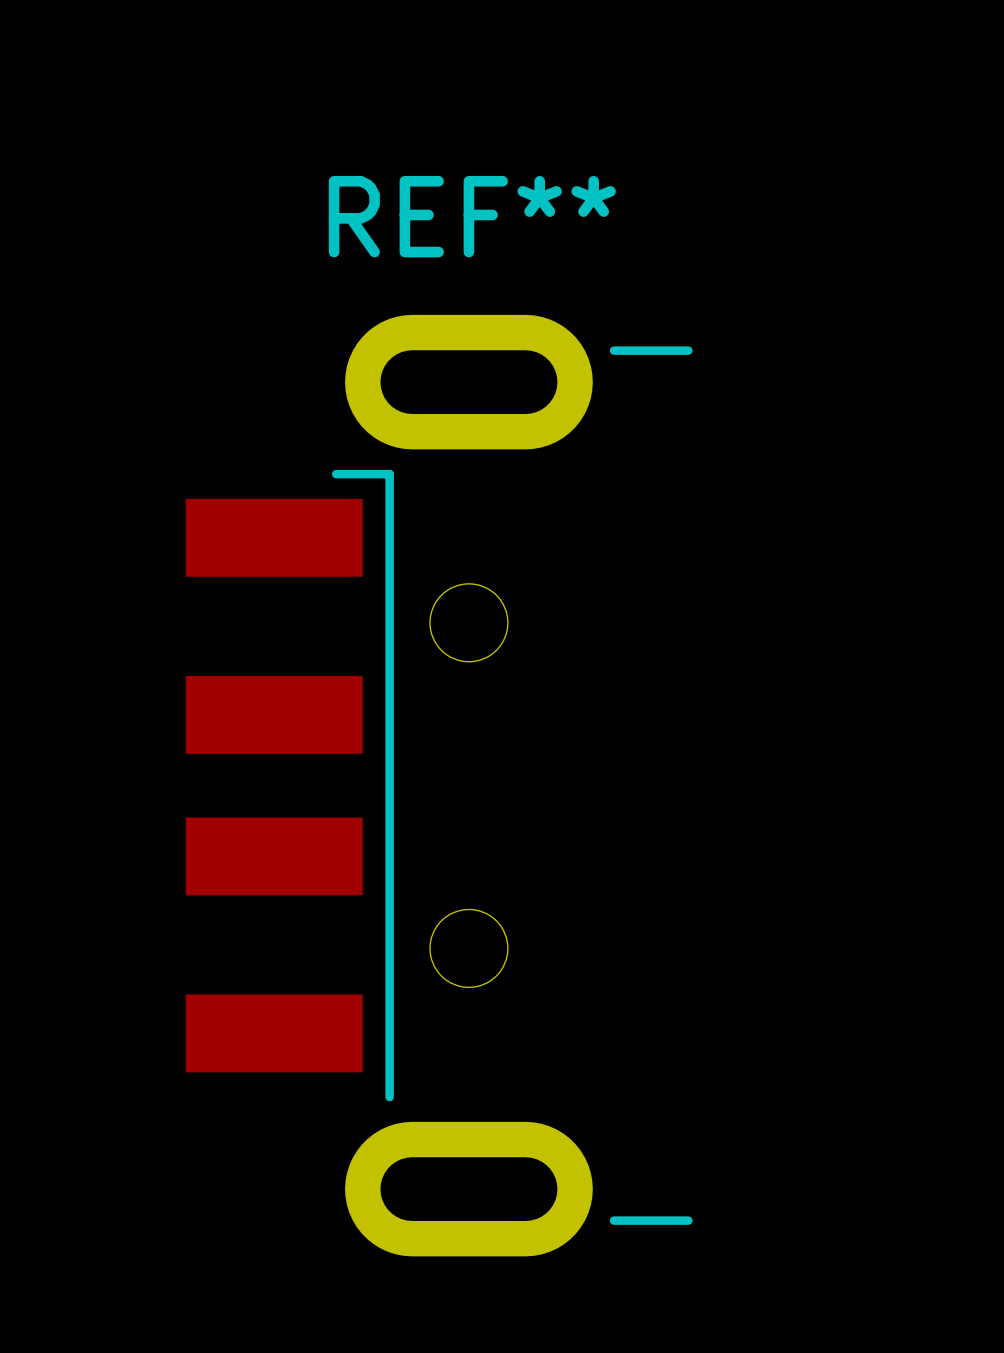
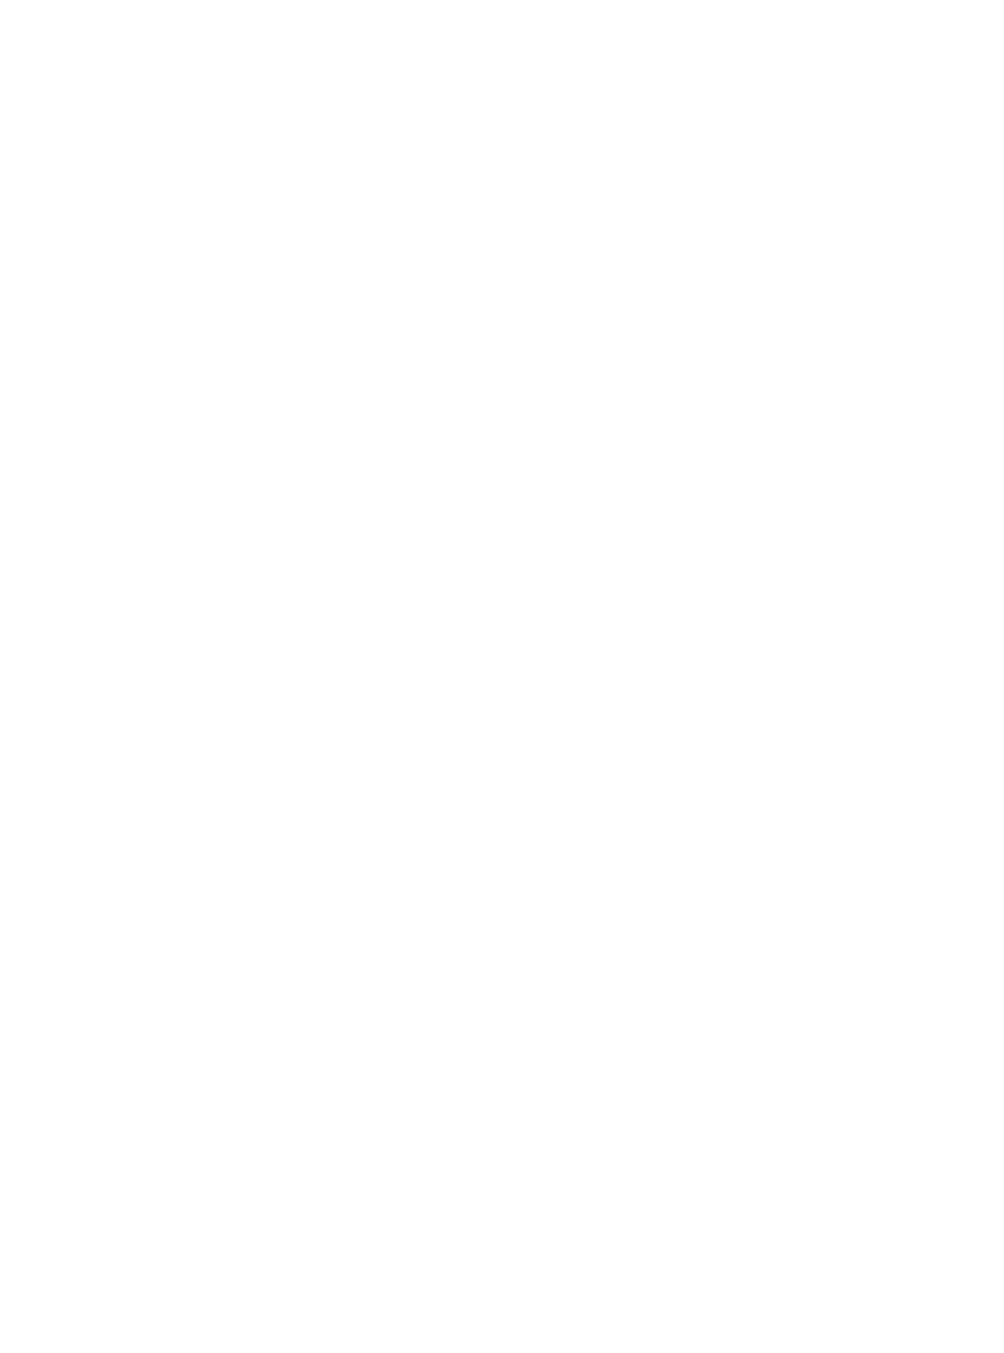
REF**: (439, 785) -> none

